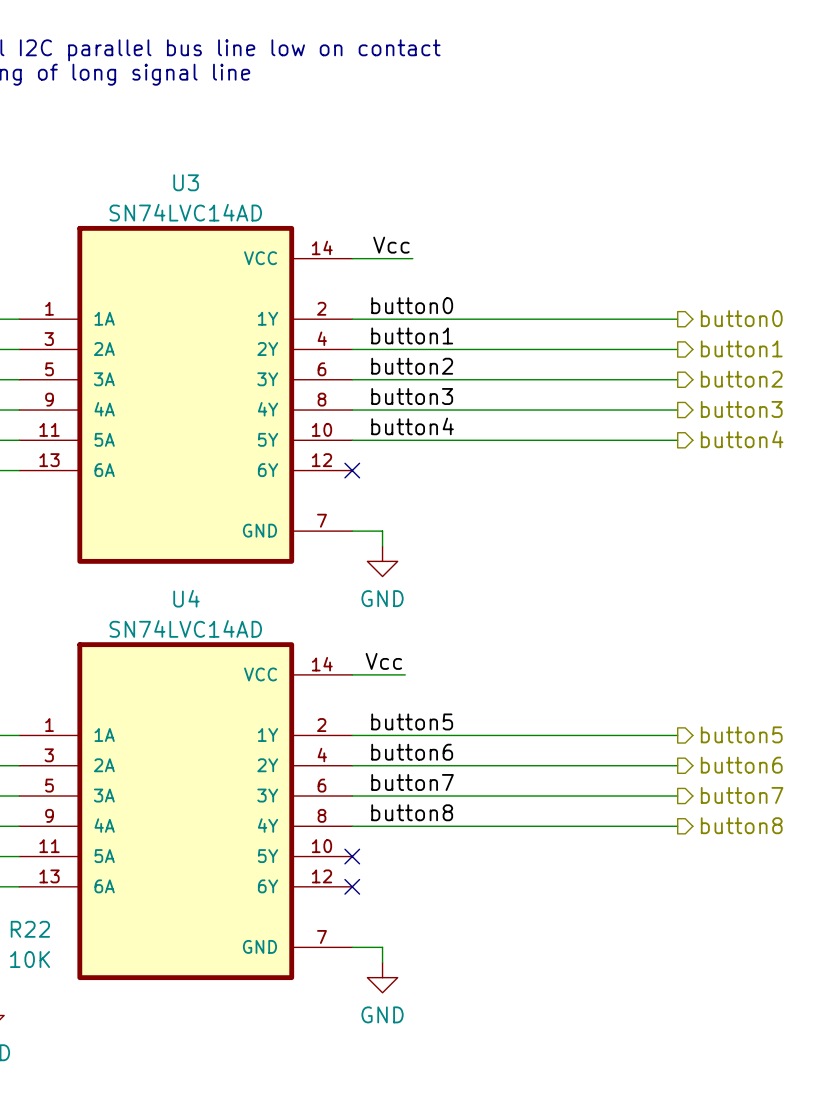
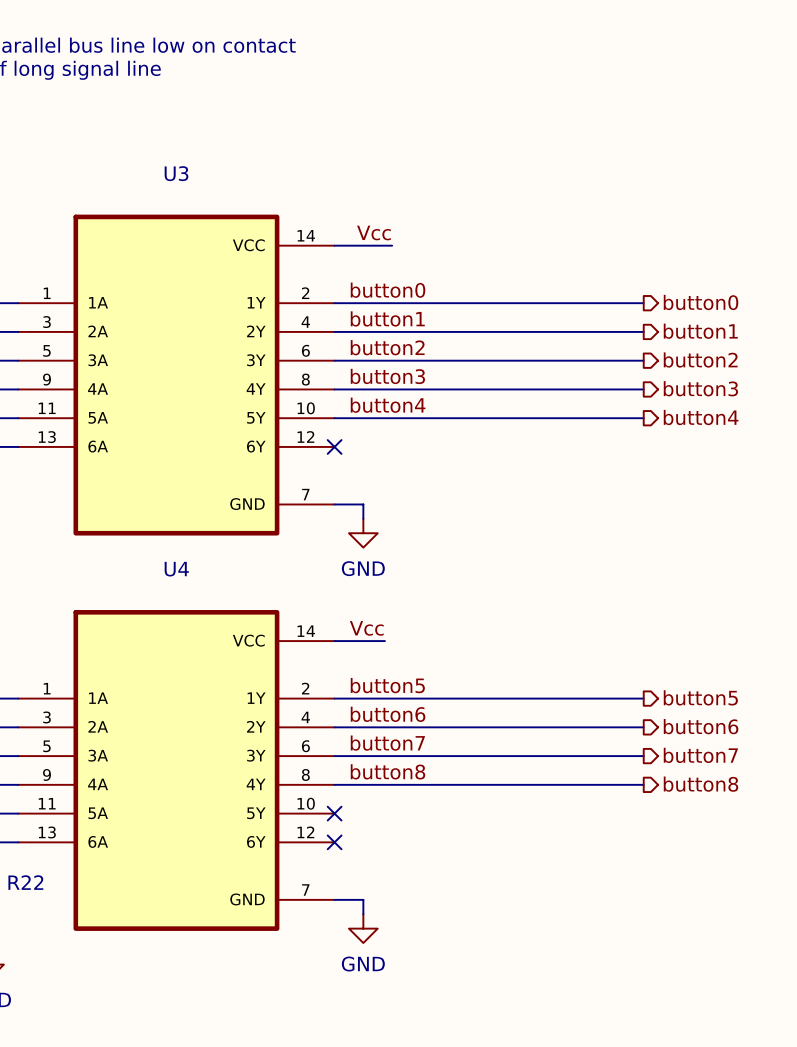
U3 value: SN74LVC14AD (185, 212) -> none
U4 value: SN74LVC14AD (185, 628) -> none
R22 value: 10K (30, 959) -> none

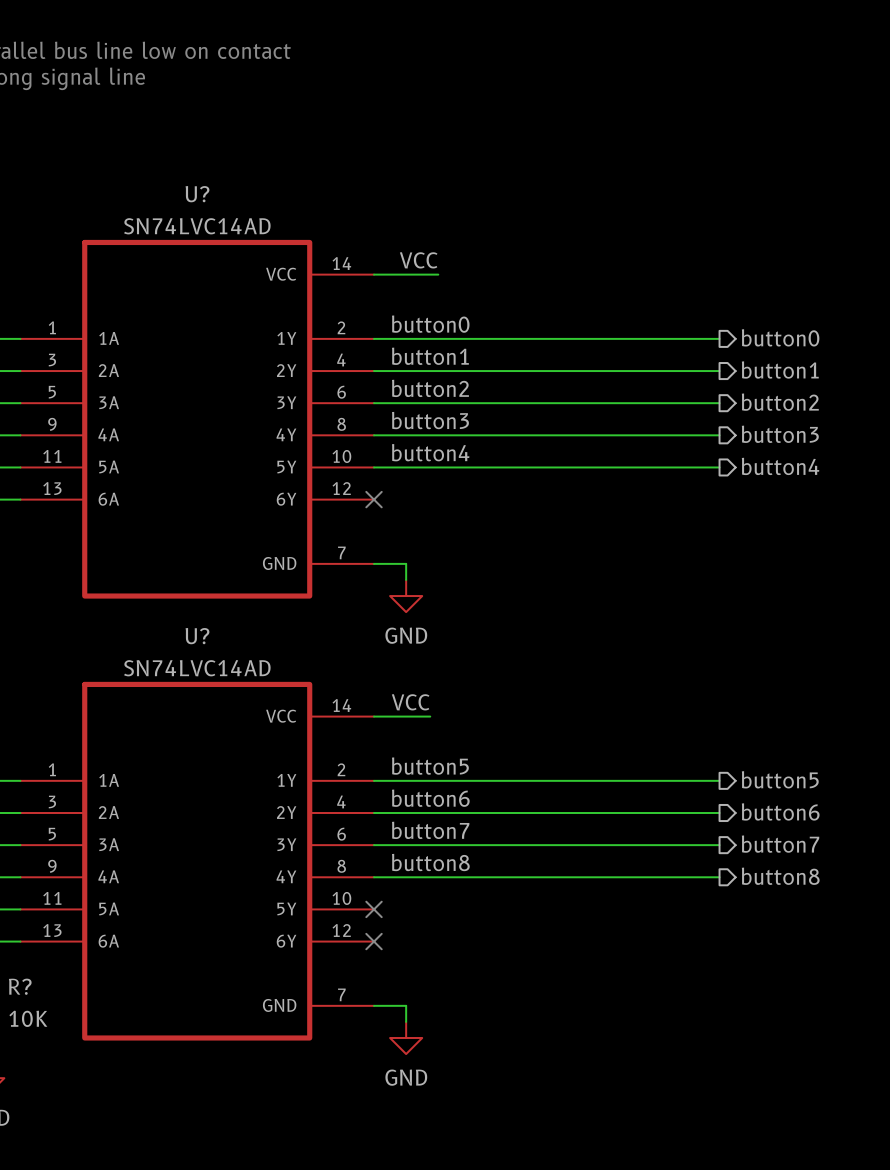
U3 name: U3 (176, 173) -> U? (197, 194)
U3 value: none -> SN74LVC14AD (197, 226)
label: Vcc (373, 232) -> VCC (418, 260)
U4 name: U4 (176, 569) -> U? (197, 636)
U4 value: none -> SN74LVC14AD (197, 668)
label: Vcc (366, 628) -> VCC (410, 702)
R22 name: R22 (25, 882) -> R? (20, 986)
R22 value: none -> 10K (28, 1018)

